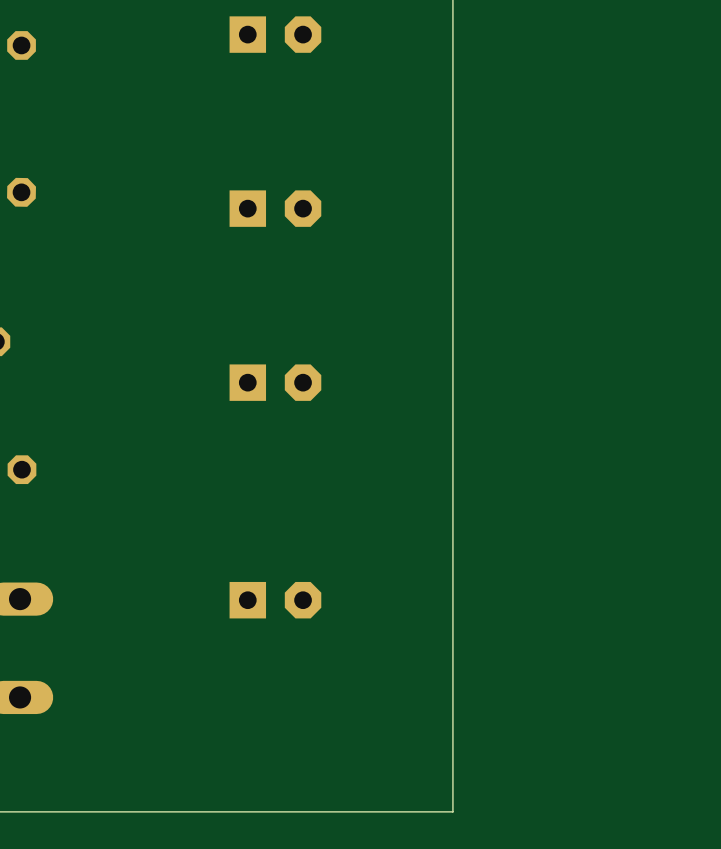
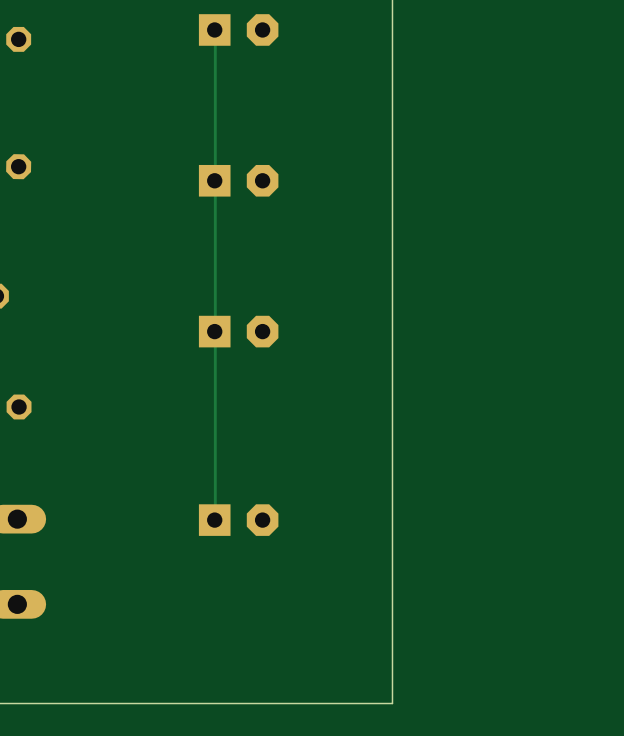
track: none -> (214, 29) (214, 520)

